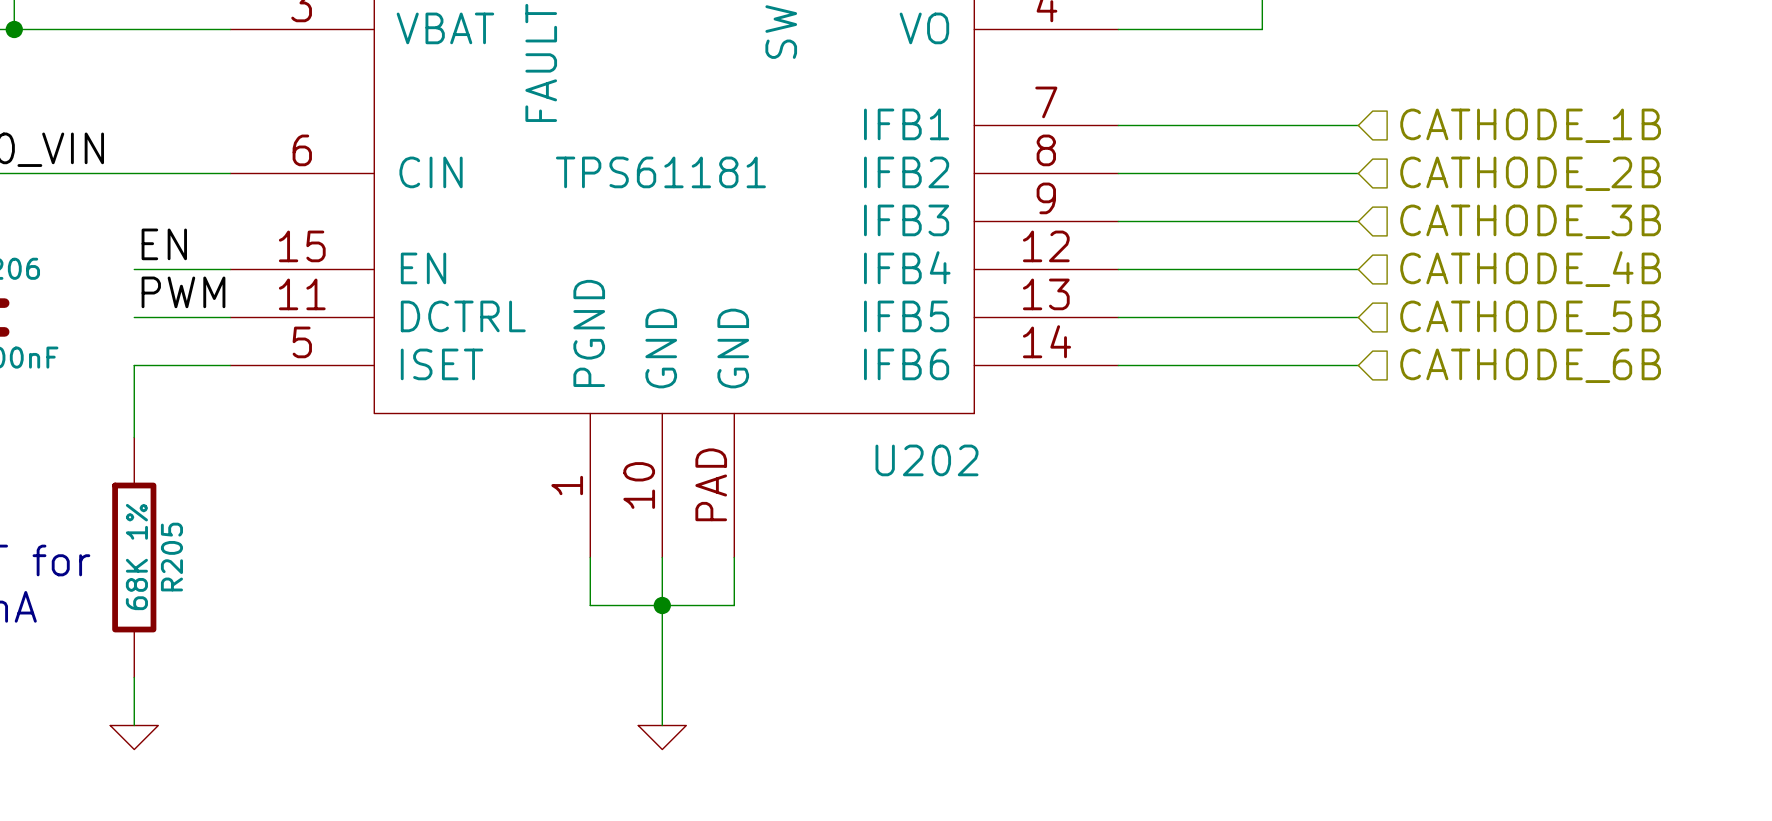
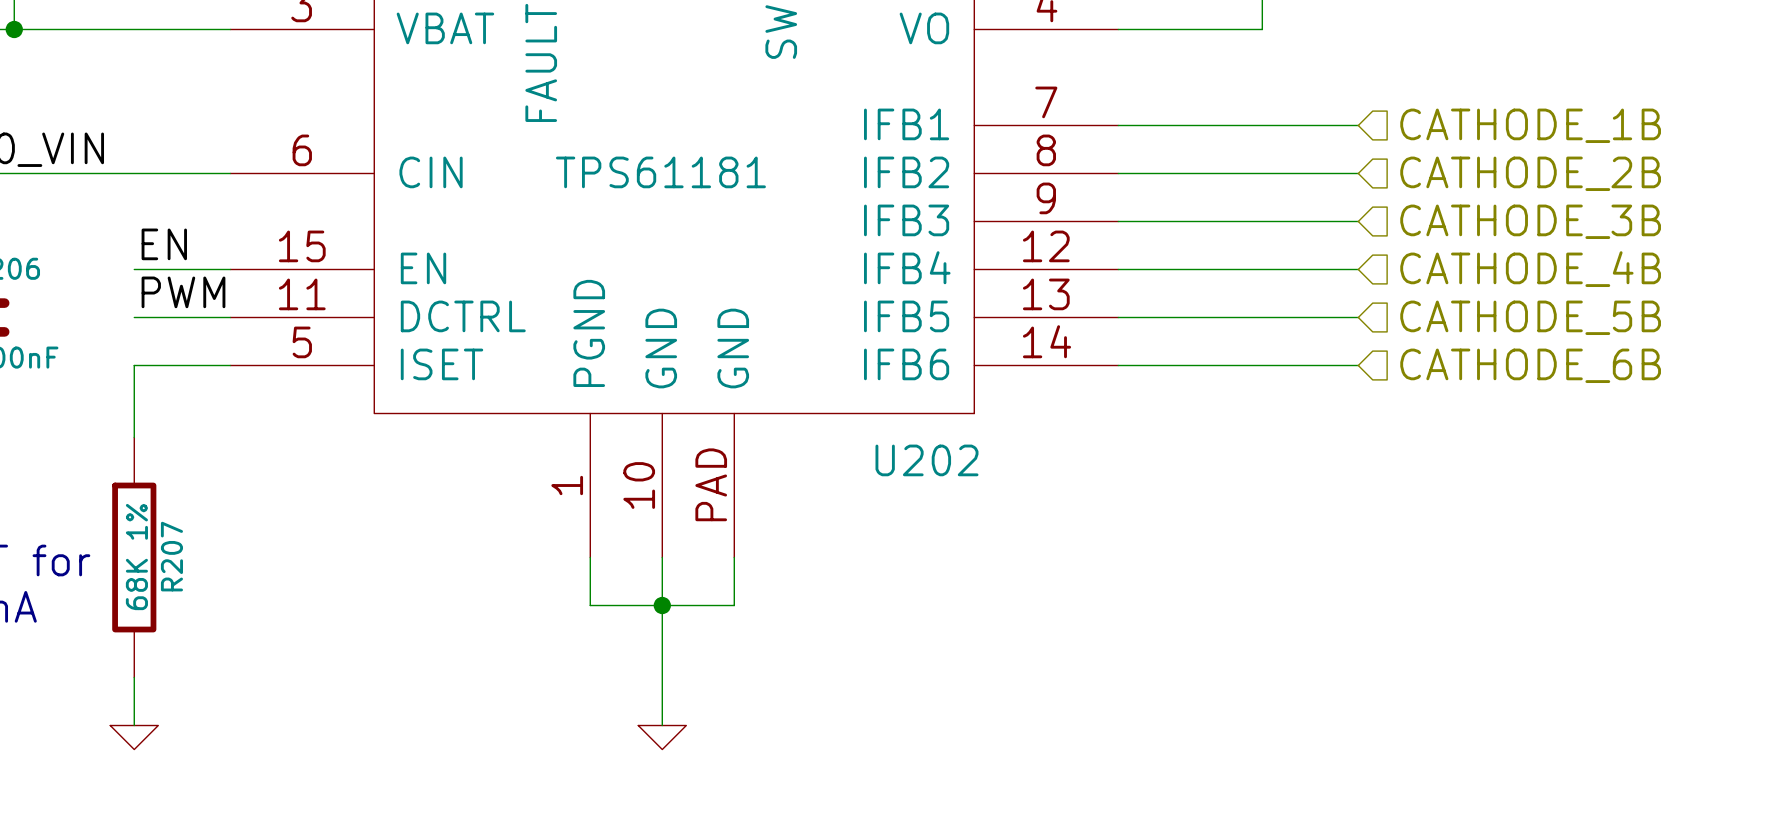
R205 name: R205 (171, 557) -> R207 (171, 556)

